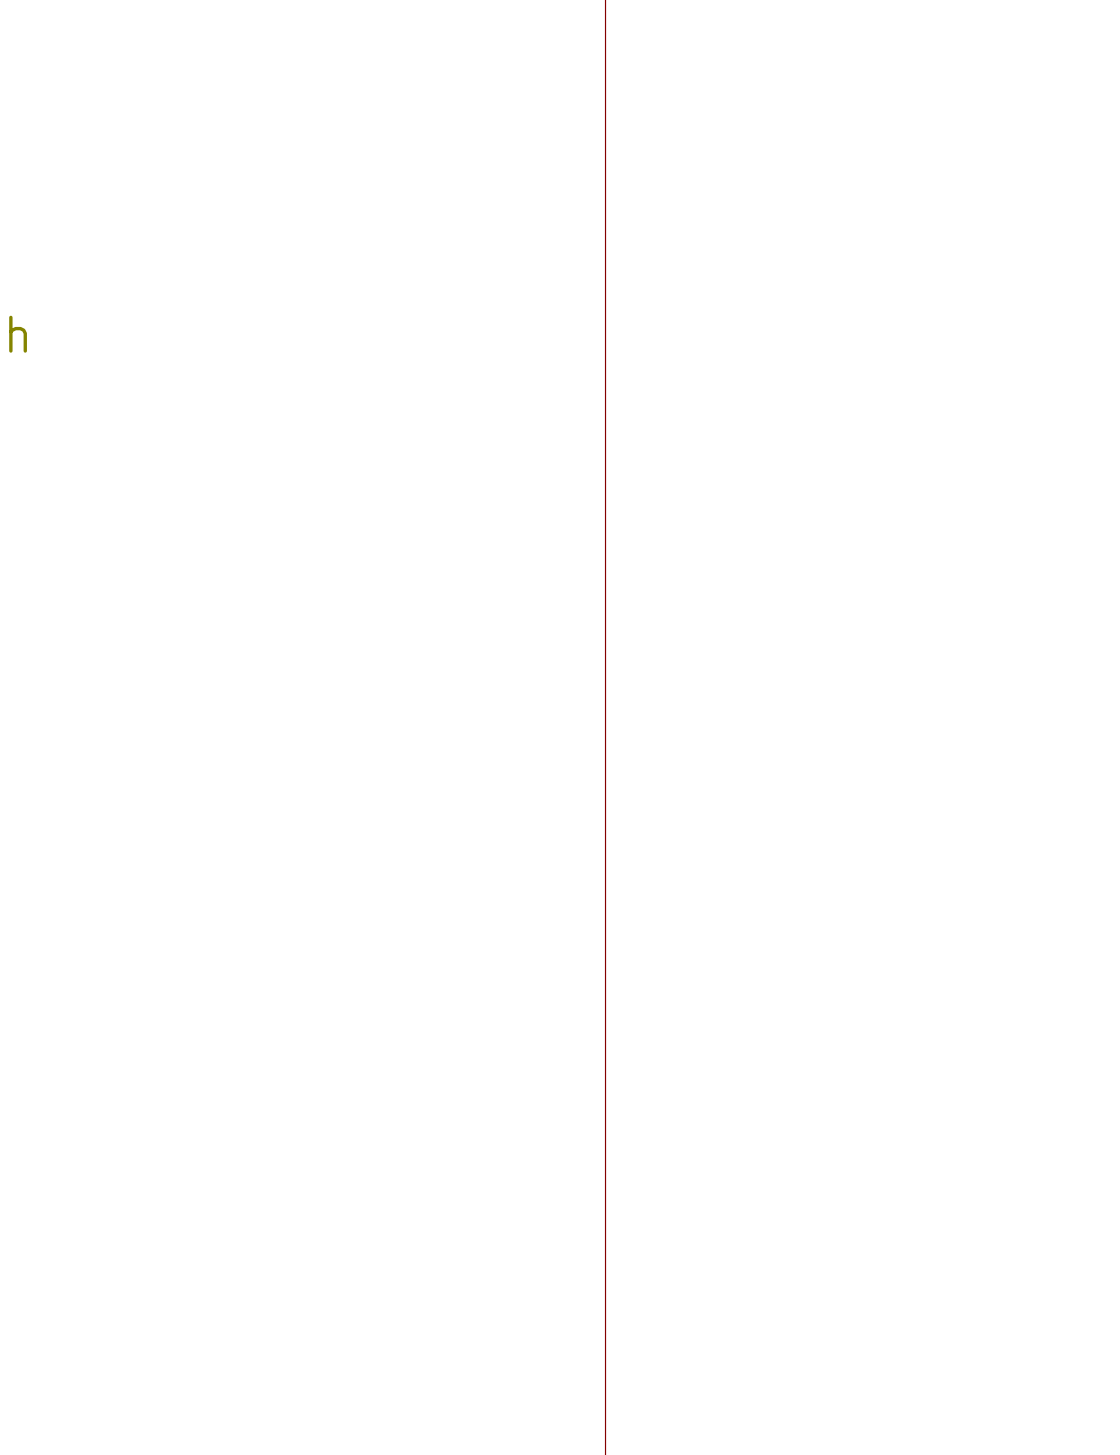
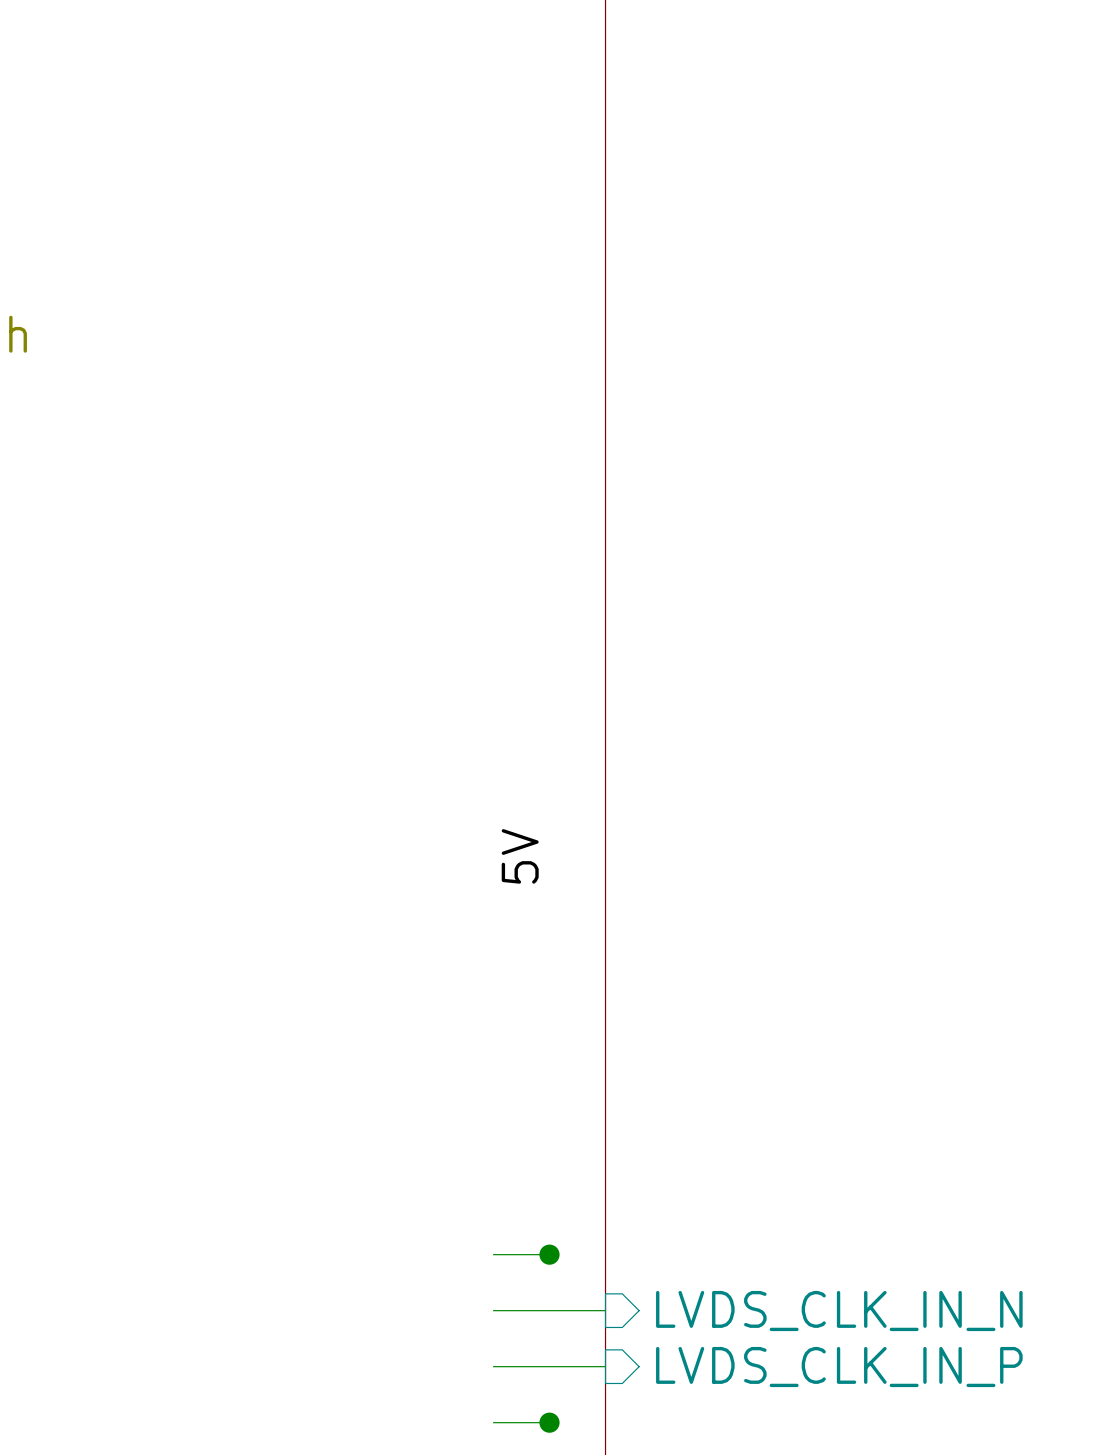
label: none -> 5V (520, 856)
wire: none -> (493, 1254) (549, 1254)
junction: none -> (549, 1254)
wire: none -> (493, 1310) (605, 1310)
sheet pin: none -> LVDS_CLK_IN_N (839, 1311)
wire: none -> (493, 1366) (605, 1366)
sheet pin: none -> LVDS_CLK_IN_P (839, 1367)
wire: none -> (493, 1422) (549, 1422)
junction: none -> (549, 1422)

